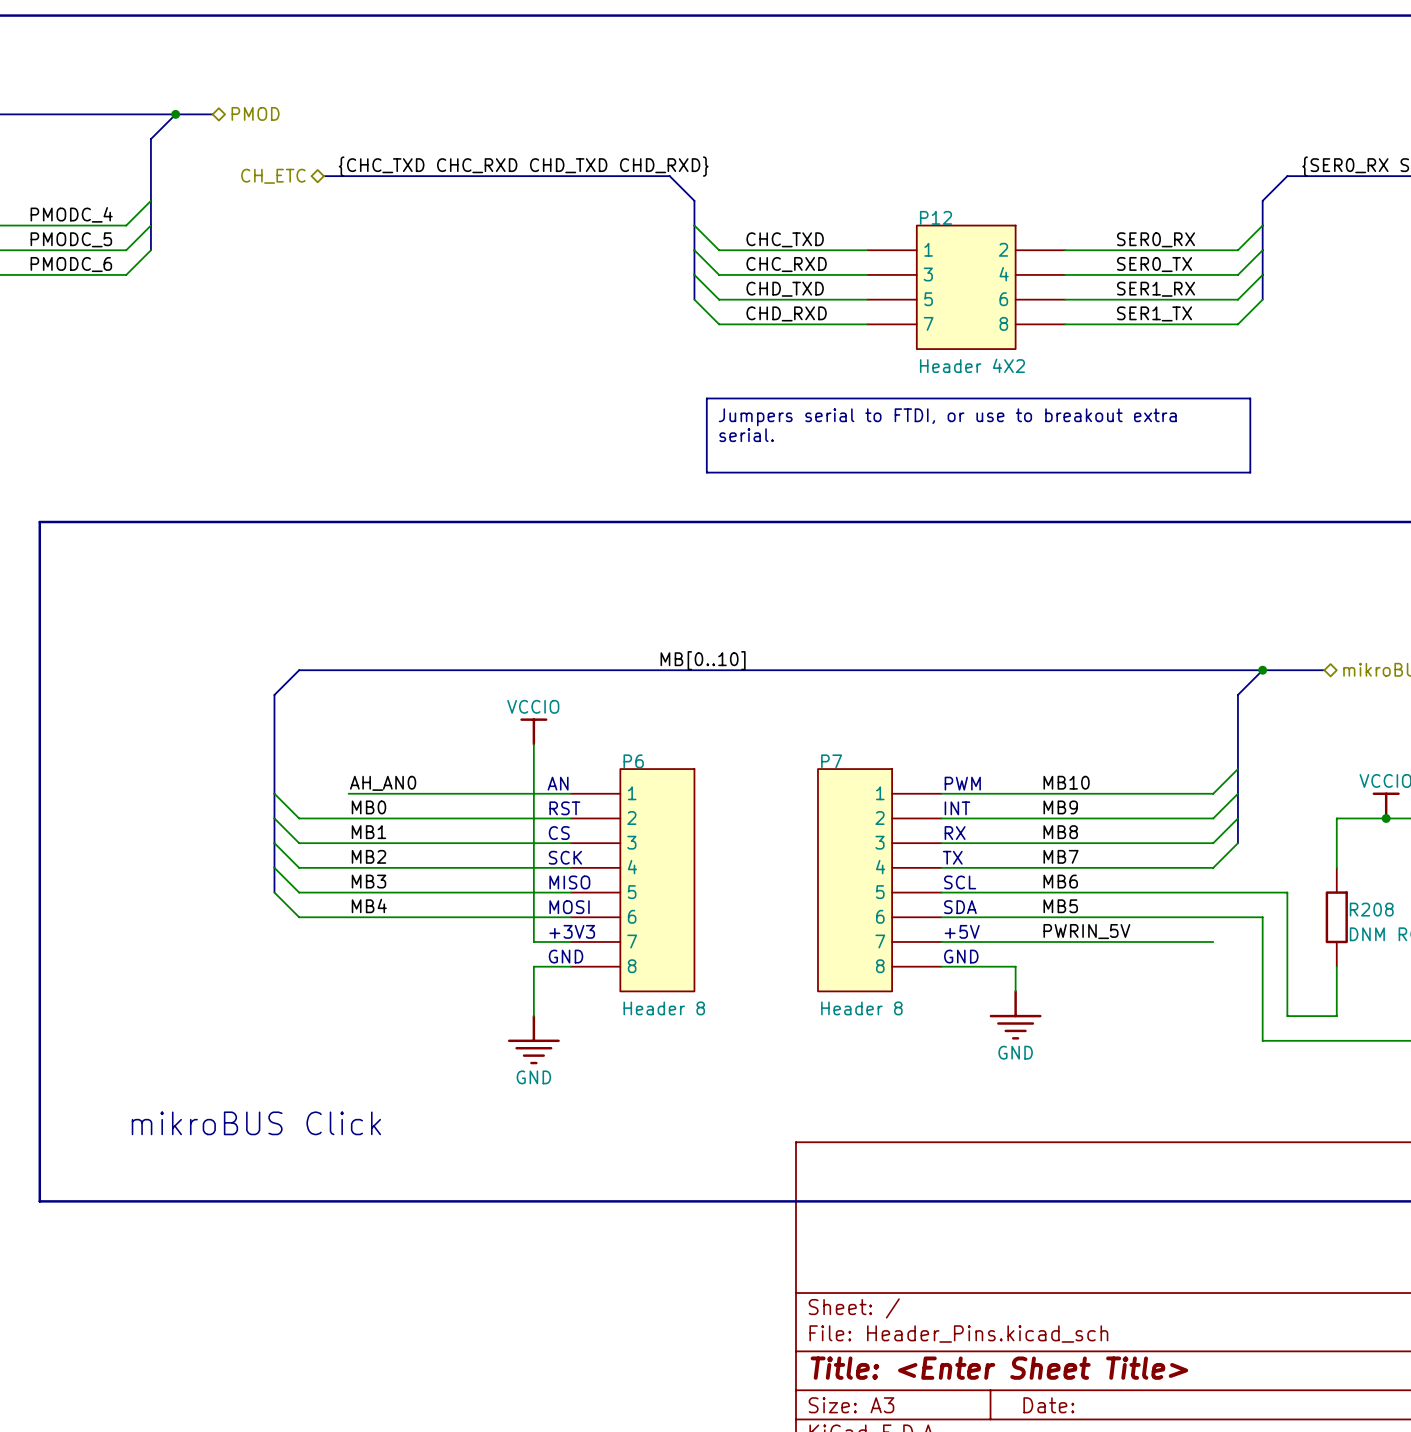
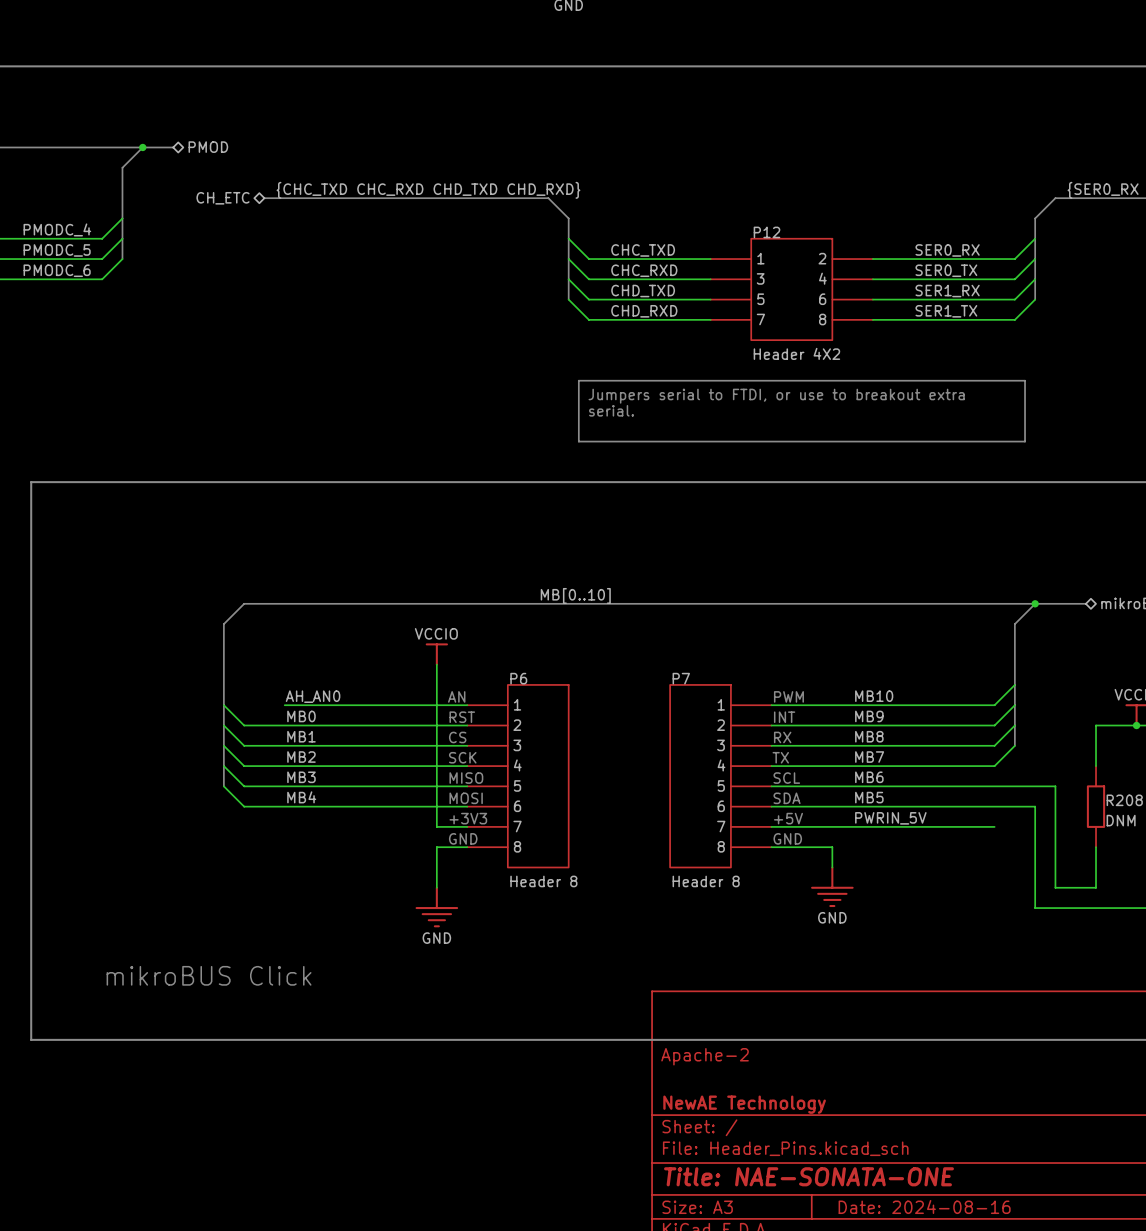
title block: none -> Apache-2 (705, 1056)
title block: none -> NewAE Technology (744, 1104)
title block: Title: <Enter Sheet Title> (999, 1368) -> Title: NAE-SONATA-ONE (809, 1176)
title block: Date: (1048, 1405) -> Date: 2024-08-16 (924, 1206)

